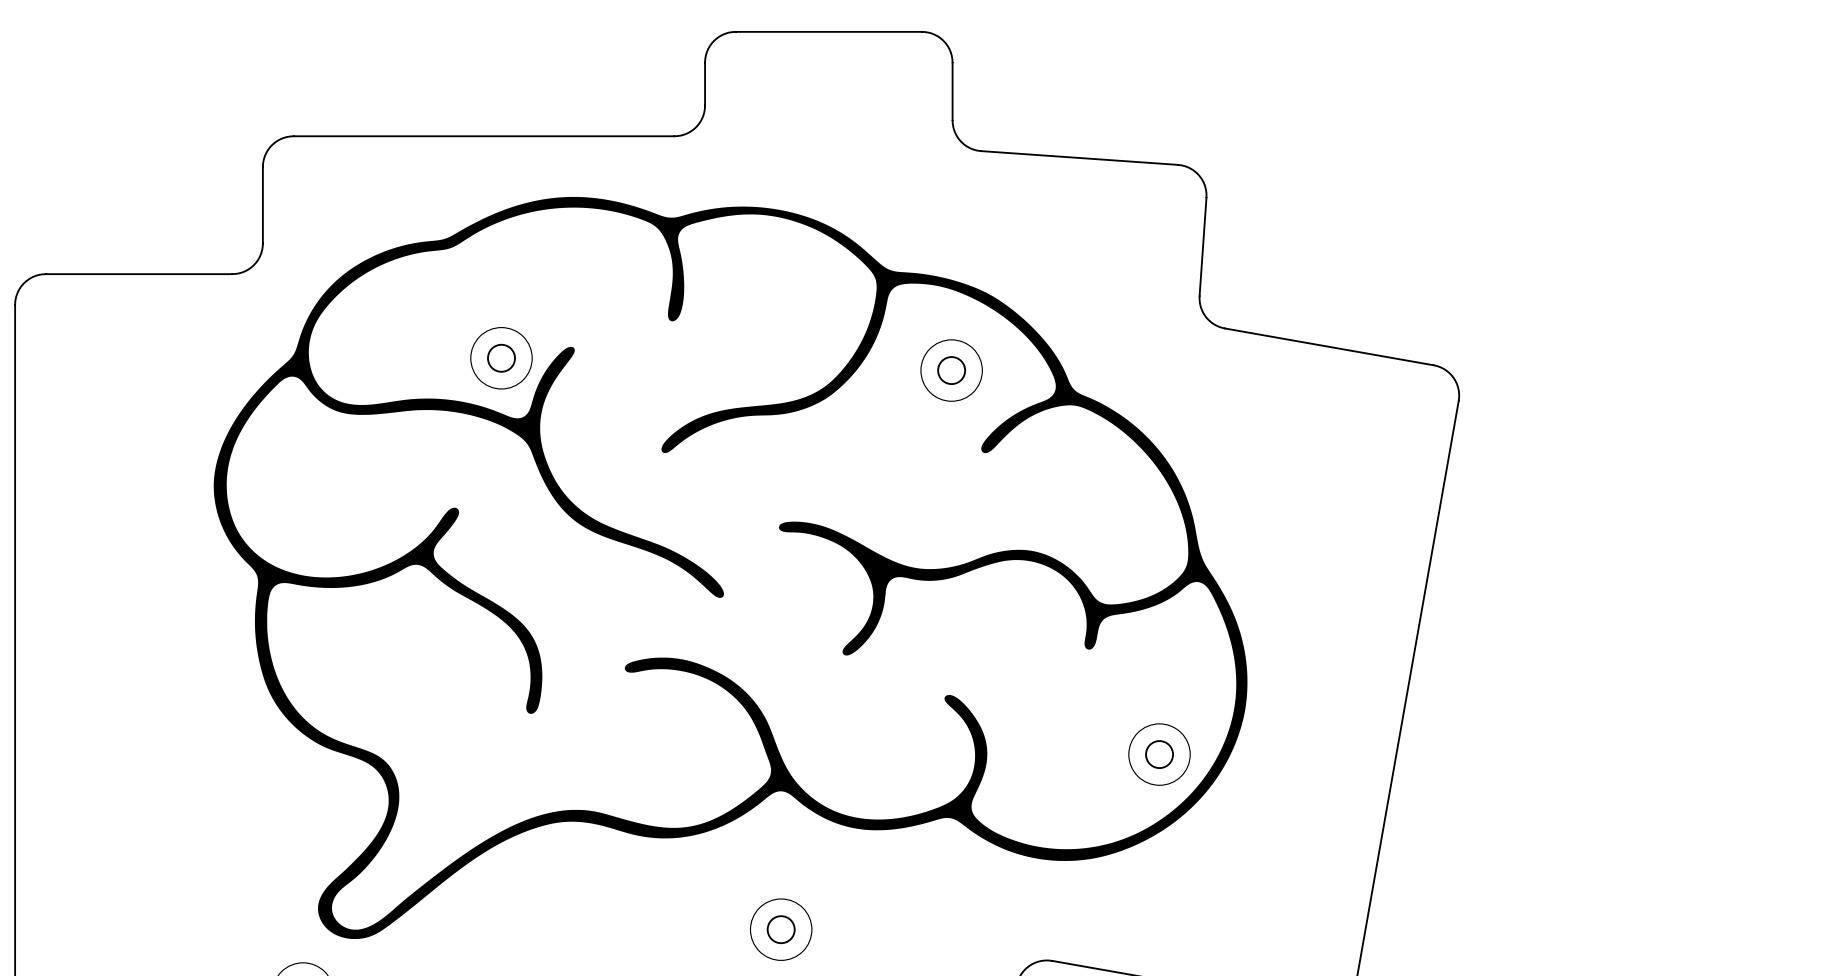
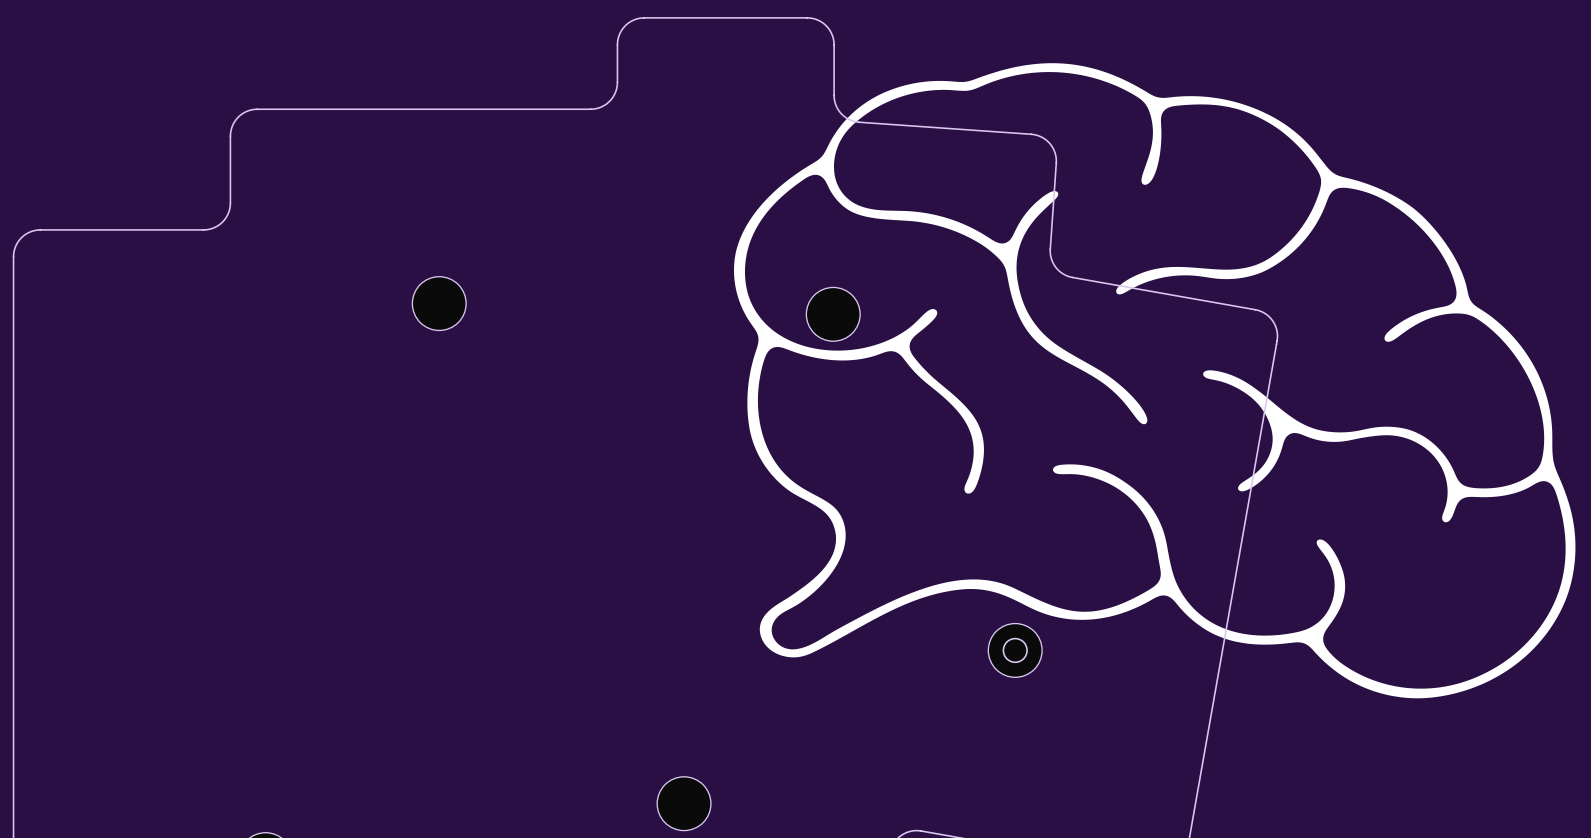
drawing: none -> [734, 63, 1576, 699]
drawing: [213, 196, 1248, 940] -> none
round board edge: [487, 343, 516, 373] -> none
round board edge: [937, 356, 967, 386] -> none
round board edge: [766, 915, 796, 945] -> none

